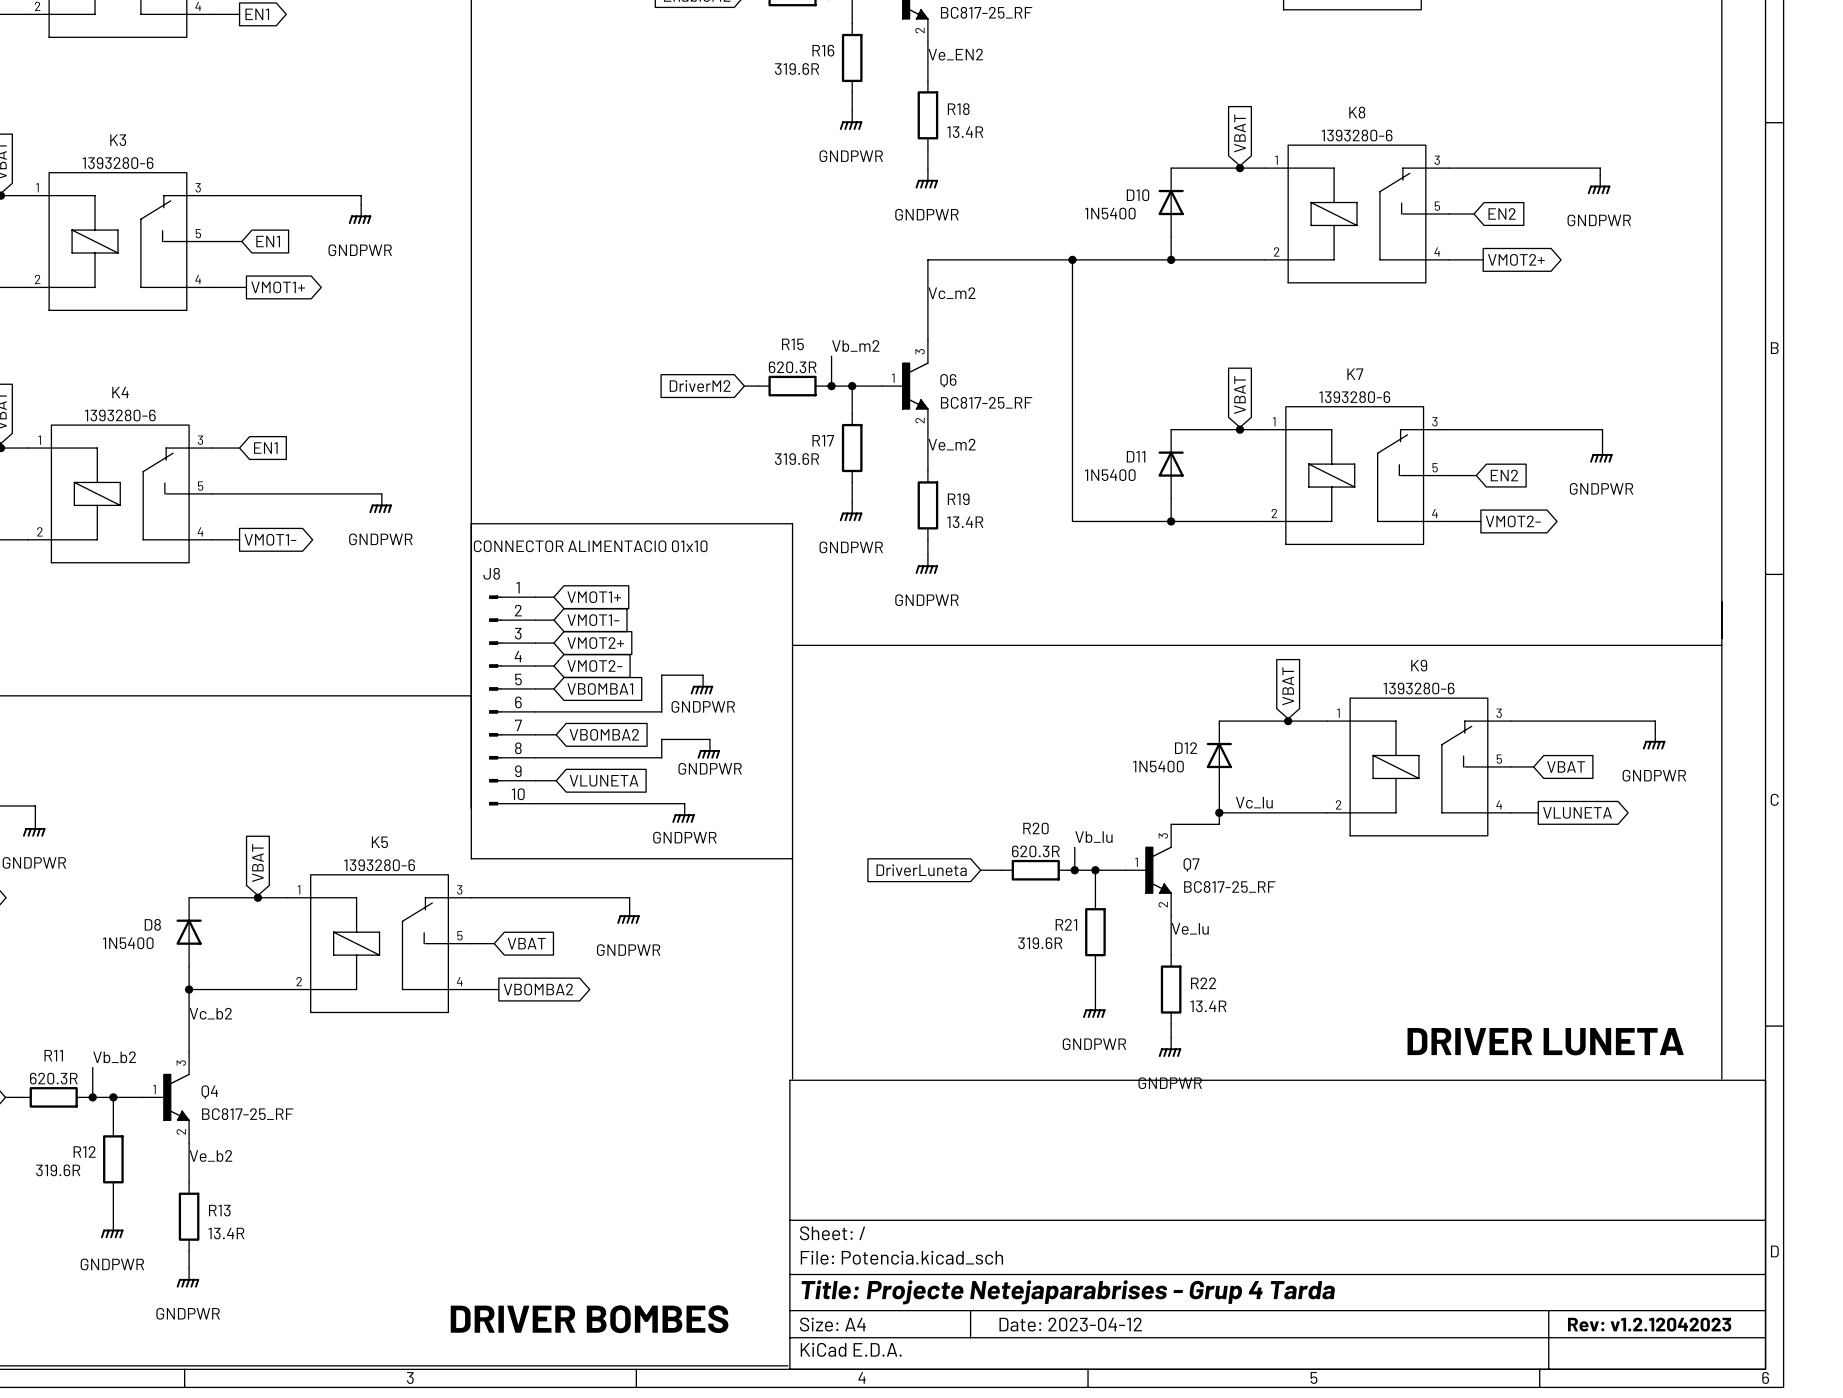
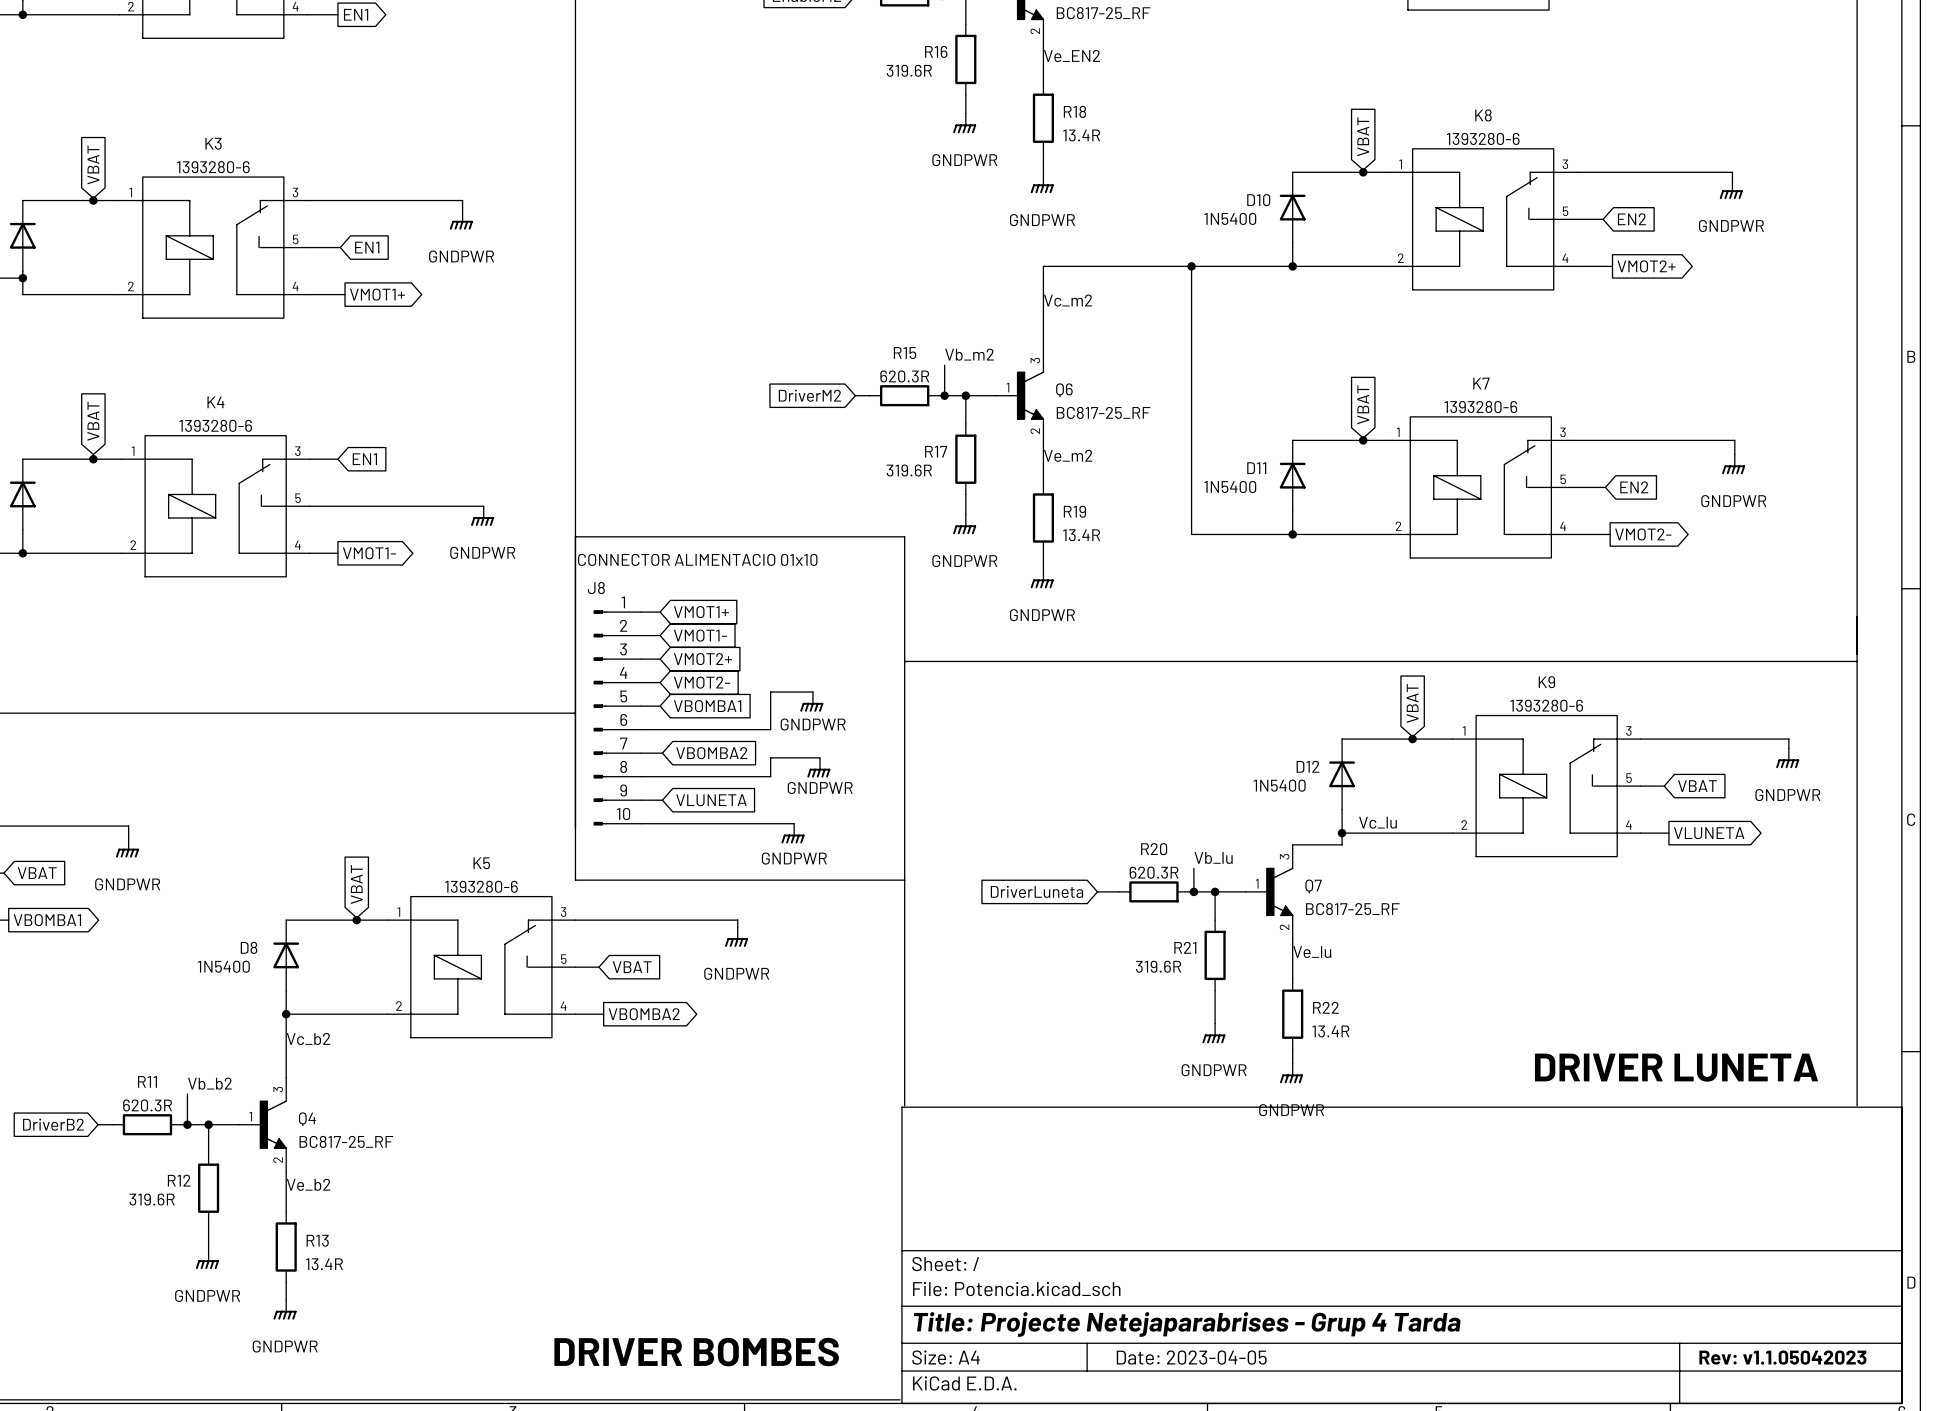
title block: Date: 2023-04-12 (1070, 1324) -> Date: 2023-04-05 (1191, 1357)
title block: Rev: v1.2.12042023 (1649, 1324) -> Rev: v1.1.05042023 (1782, 1357)

